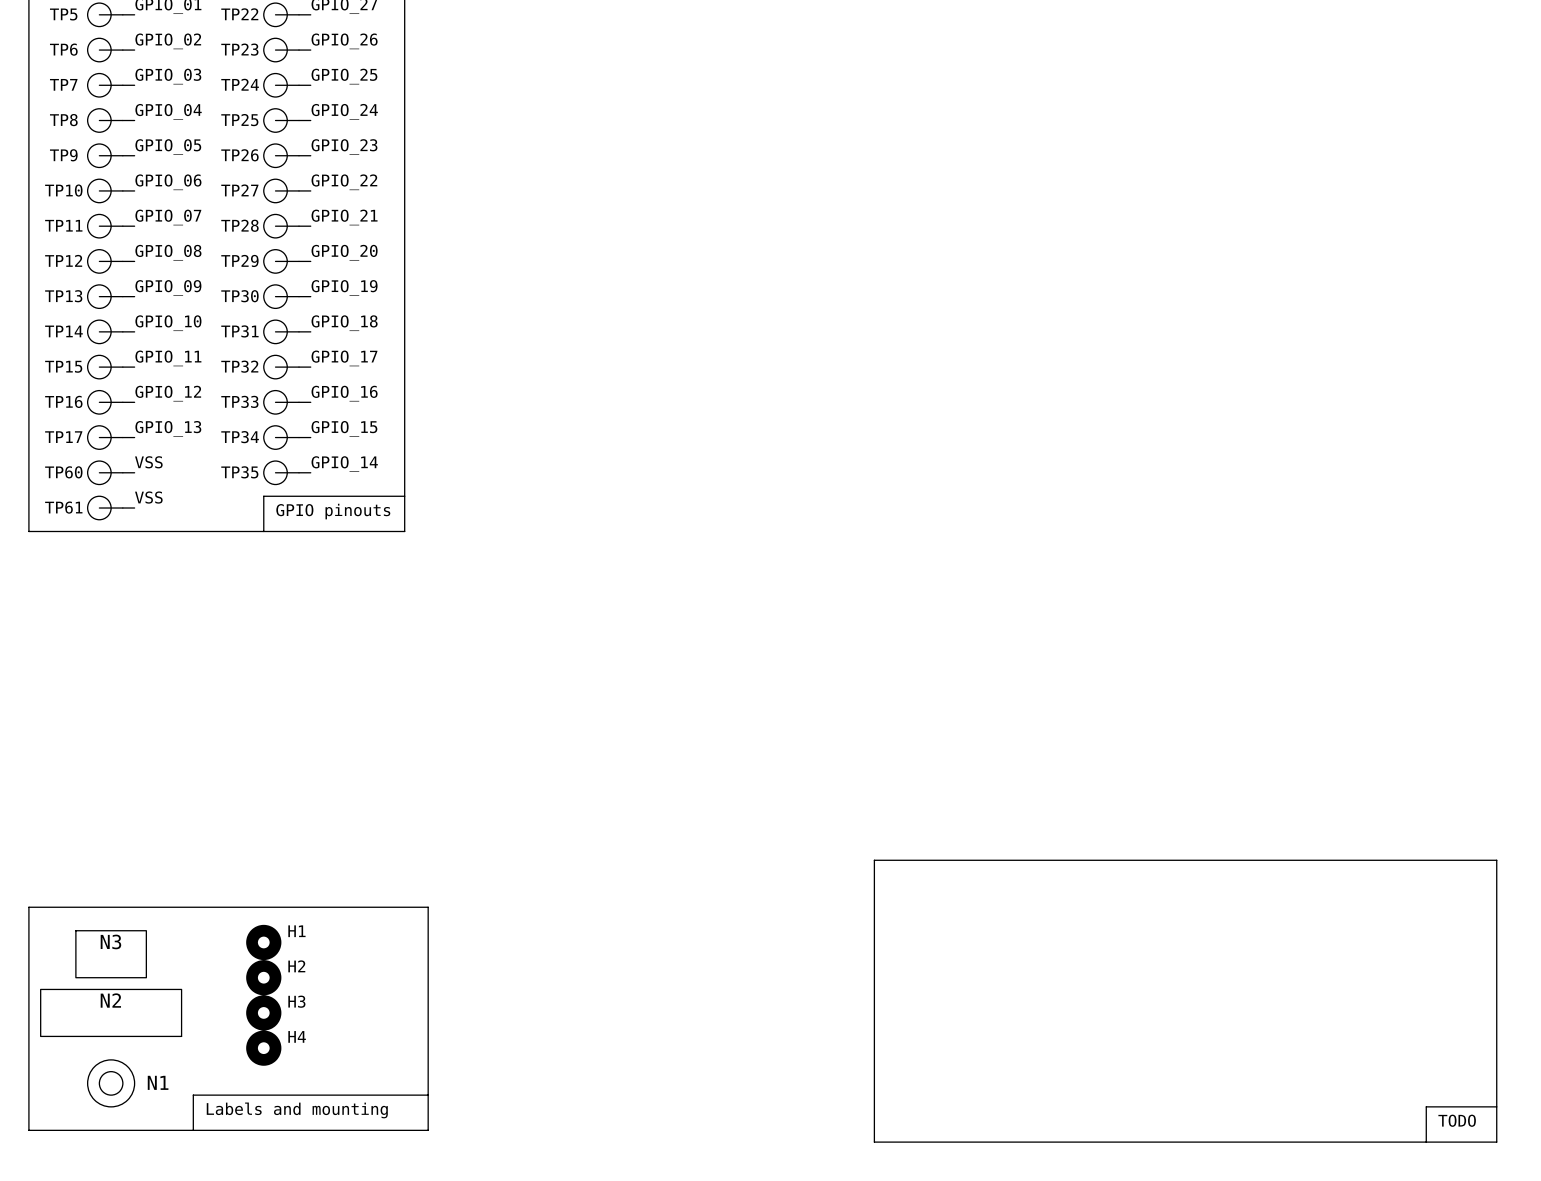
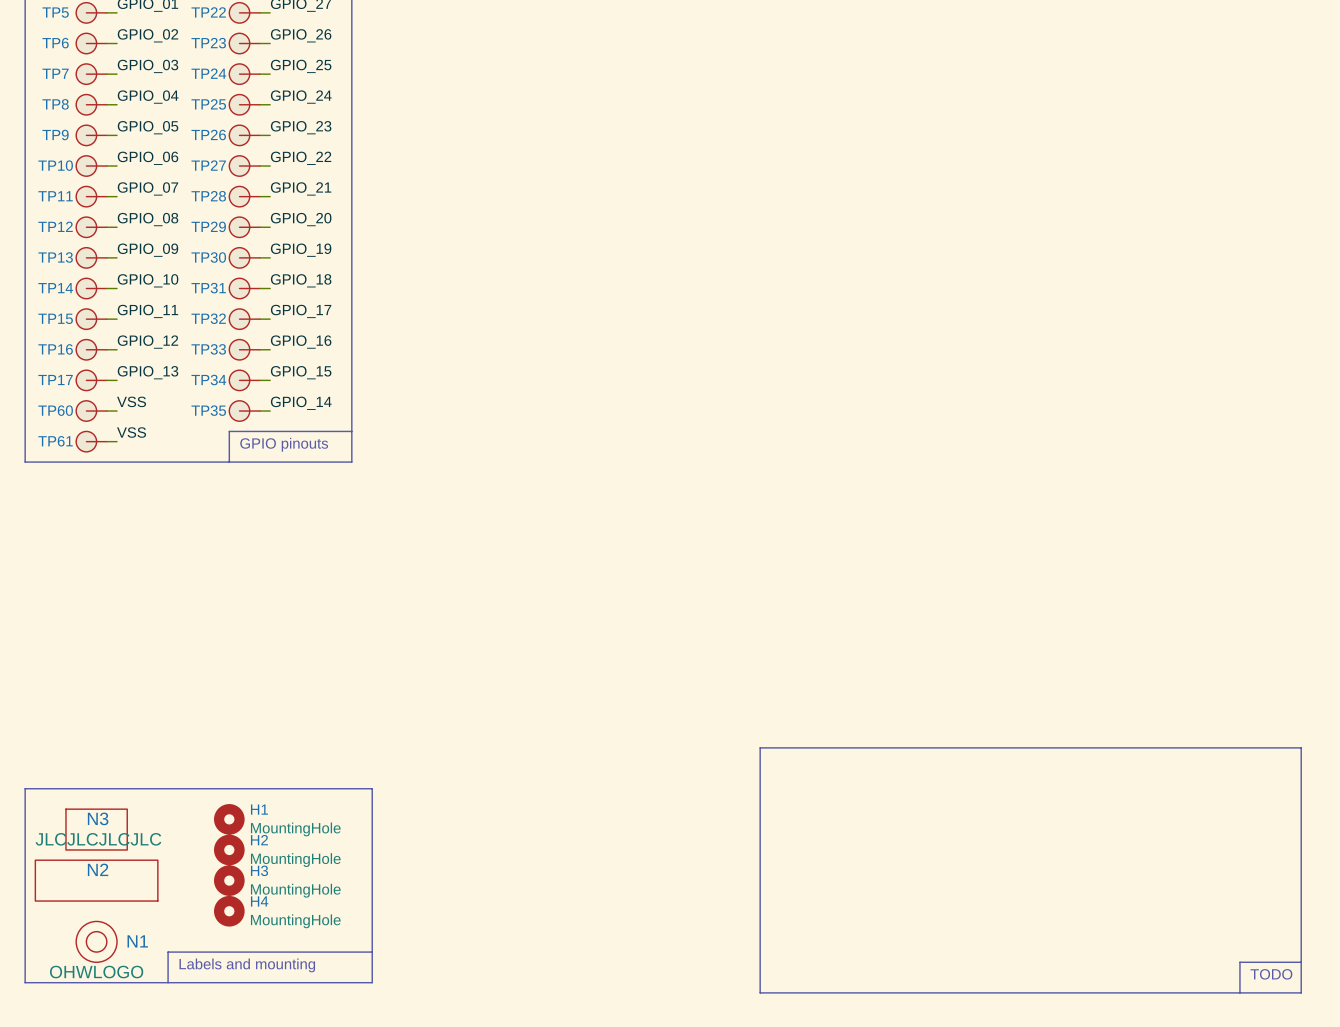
H1 value: none -> MountingHole (295, 829)
N3 value: none -> JLCJLCJLCJLC (98, 839)
H2 value: none -> MountingHole (295, 860)
H3 value: none -> MountingHole (295, 890)
H4 value: none -> MountingHole (295, 921)
N1 value: none -> OHWLOGO (96, 972)

